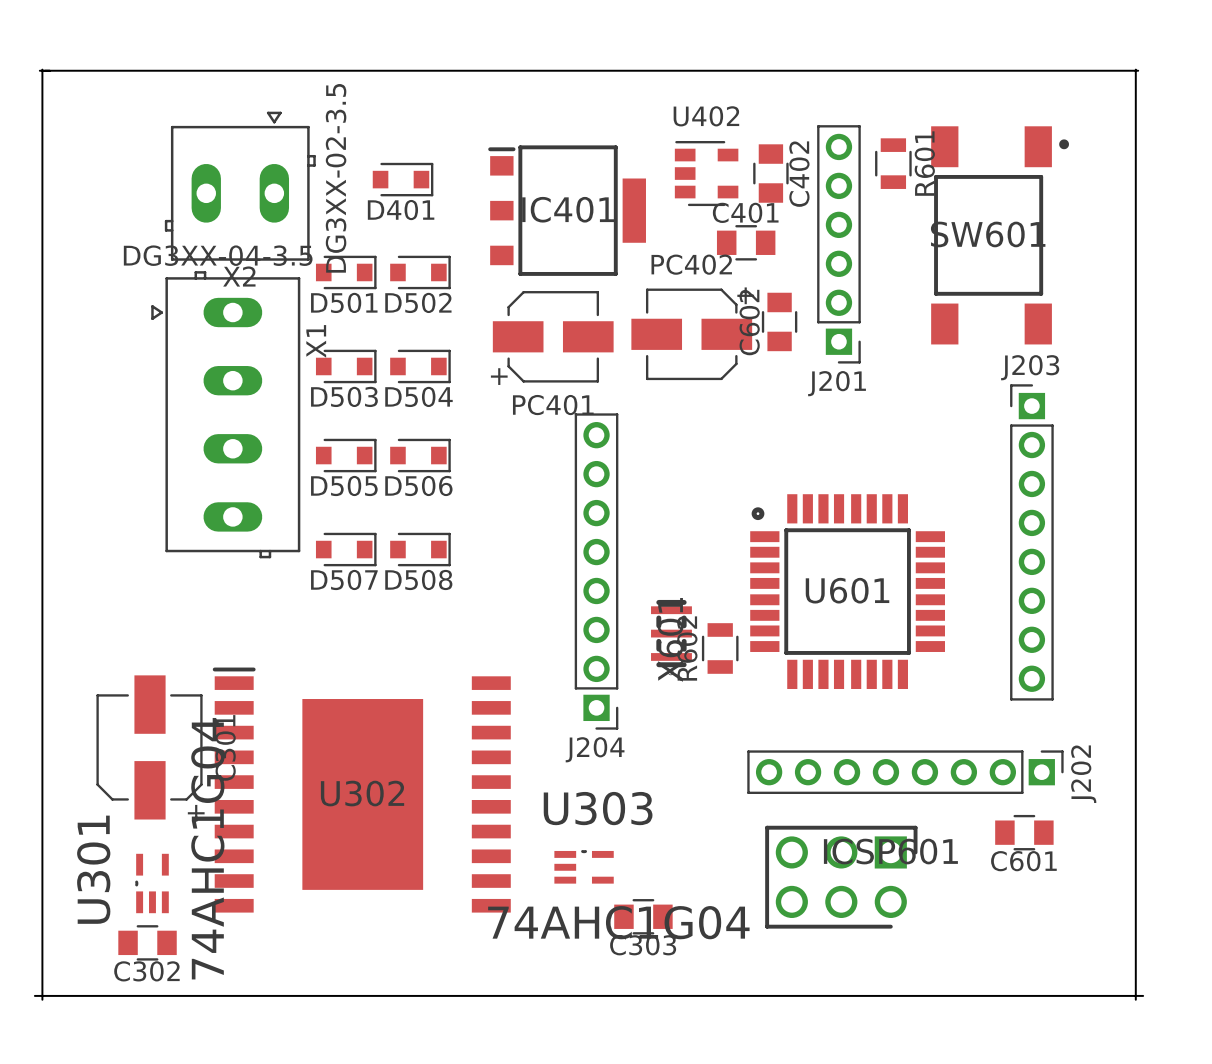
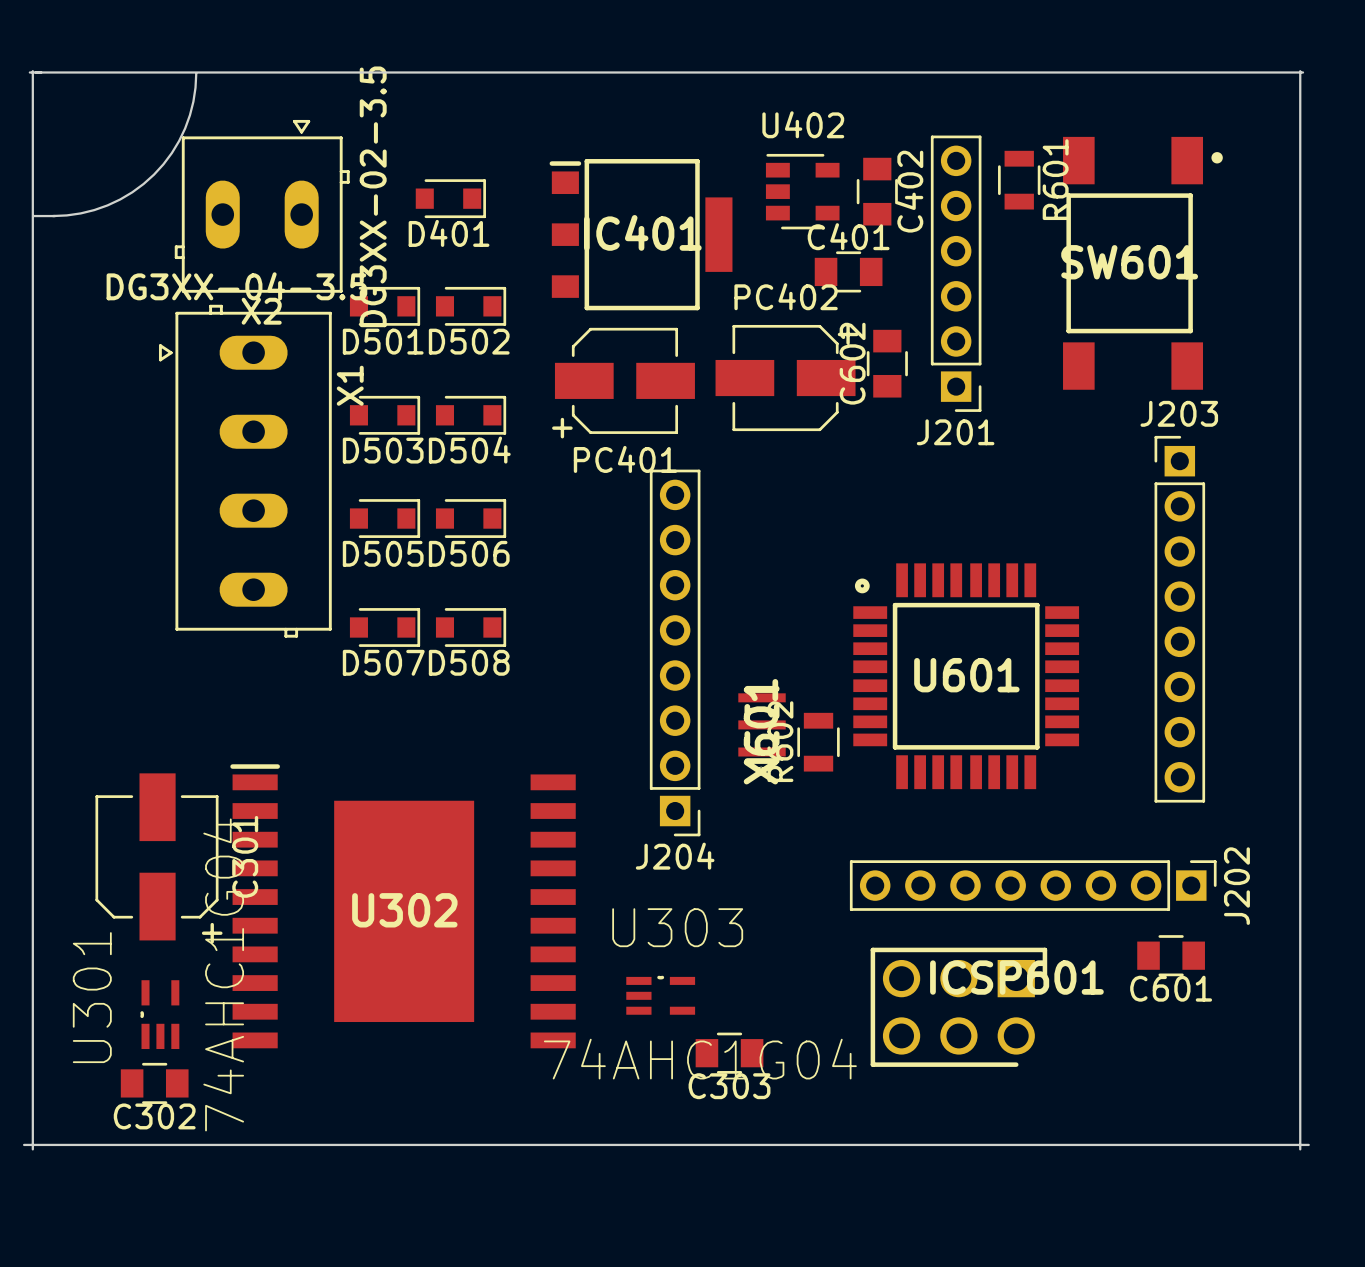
board edge: none -> (196, 73) (193, 101) (185, 128) (171, 153) (154, 174) (132, 192) (107, 205) (80, 213) (52, 216)
board edge: none -> (33, 216) (55, 216)

